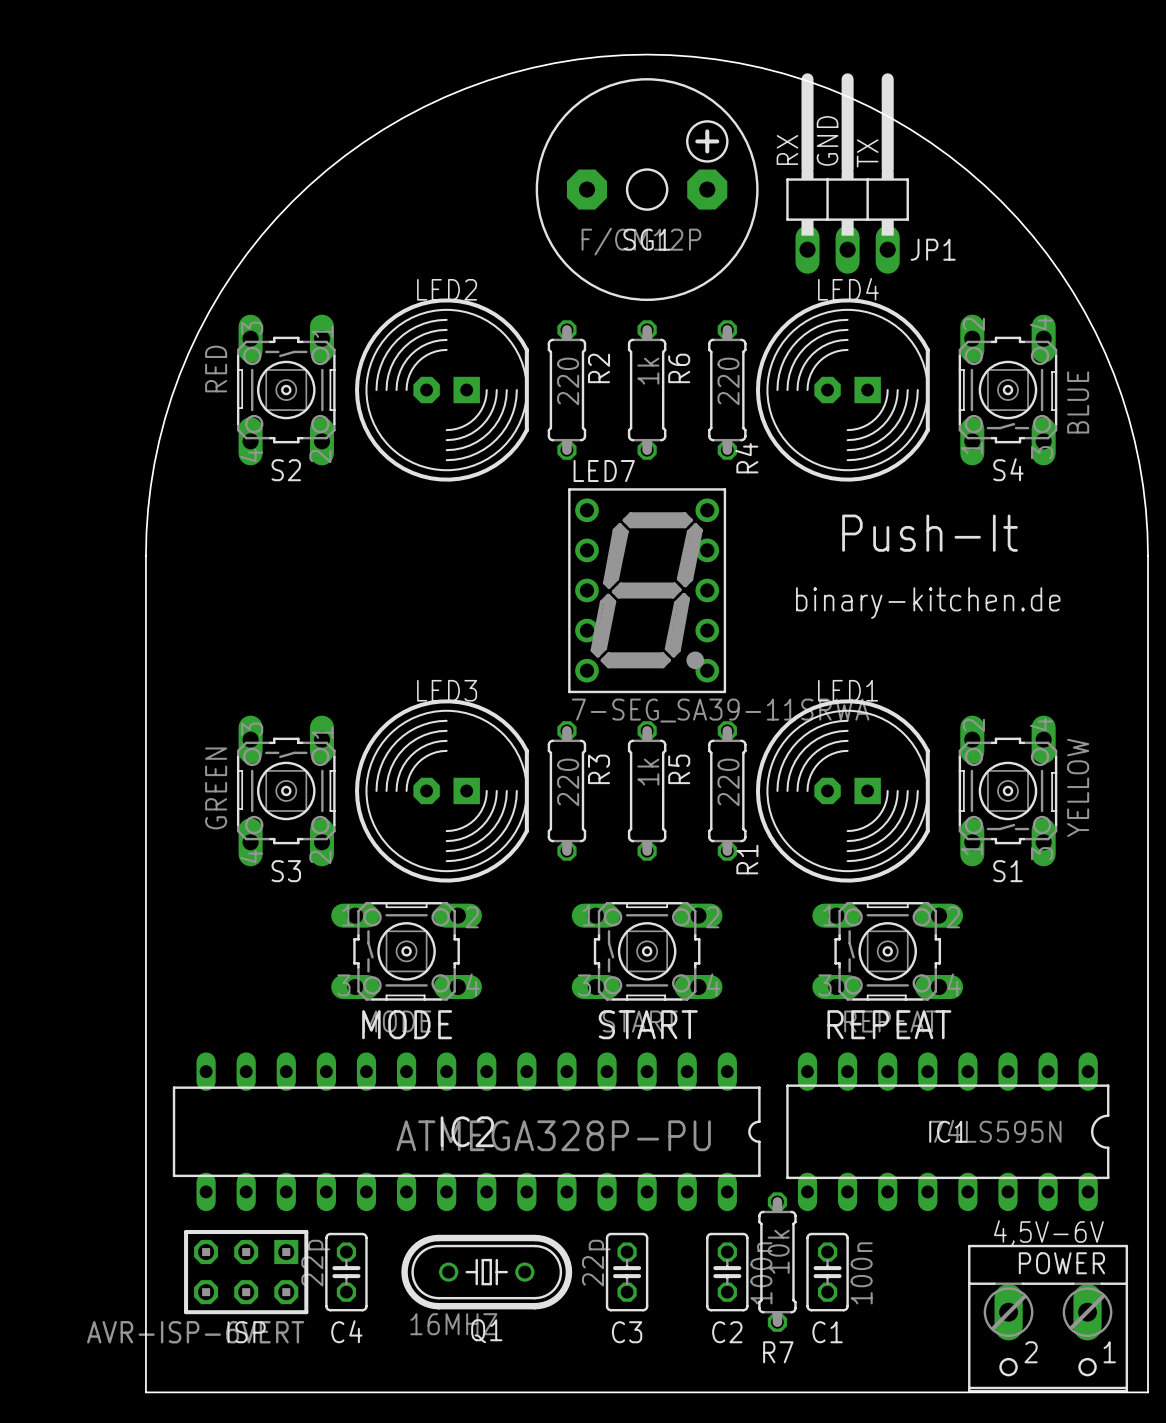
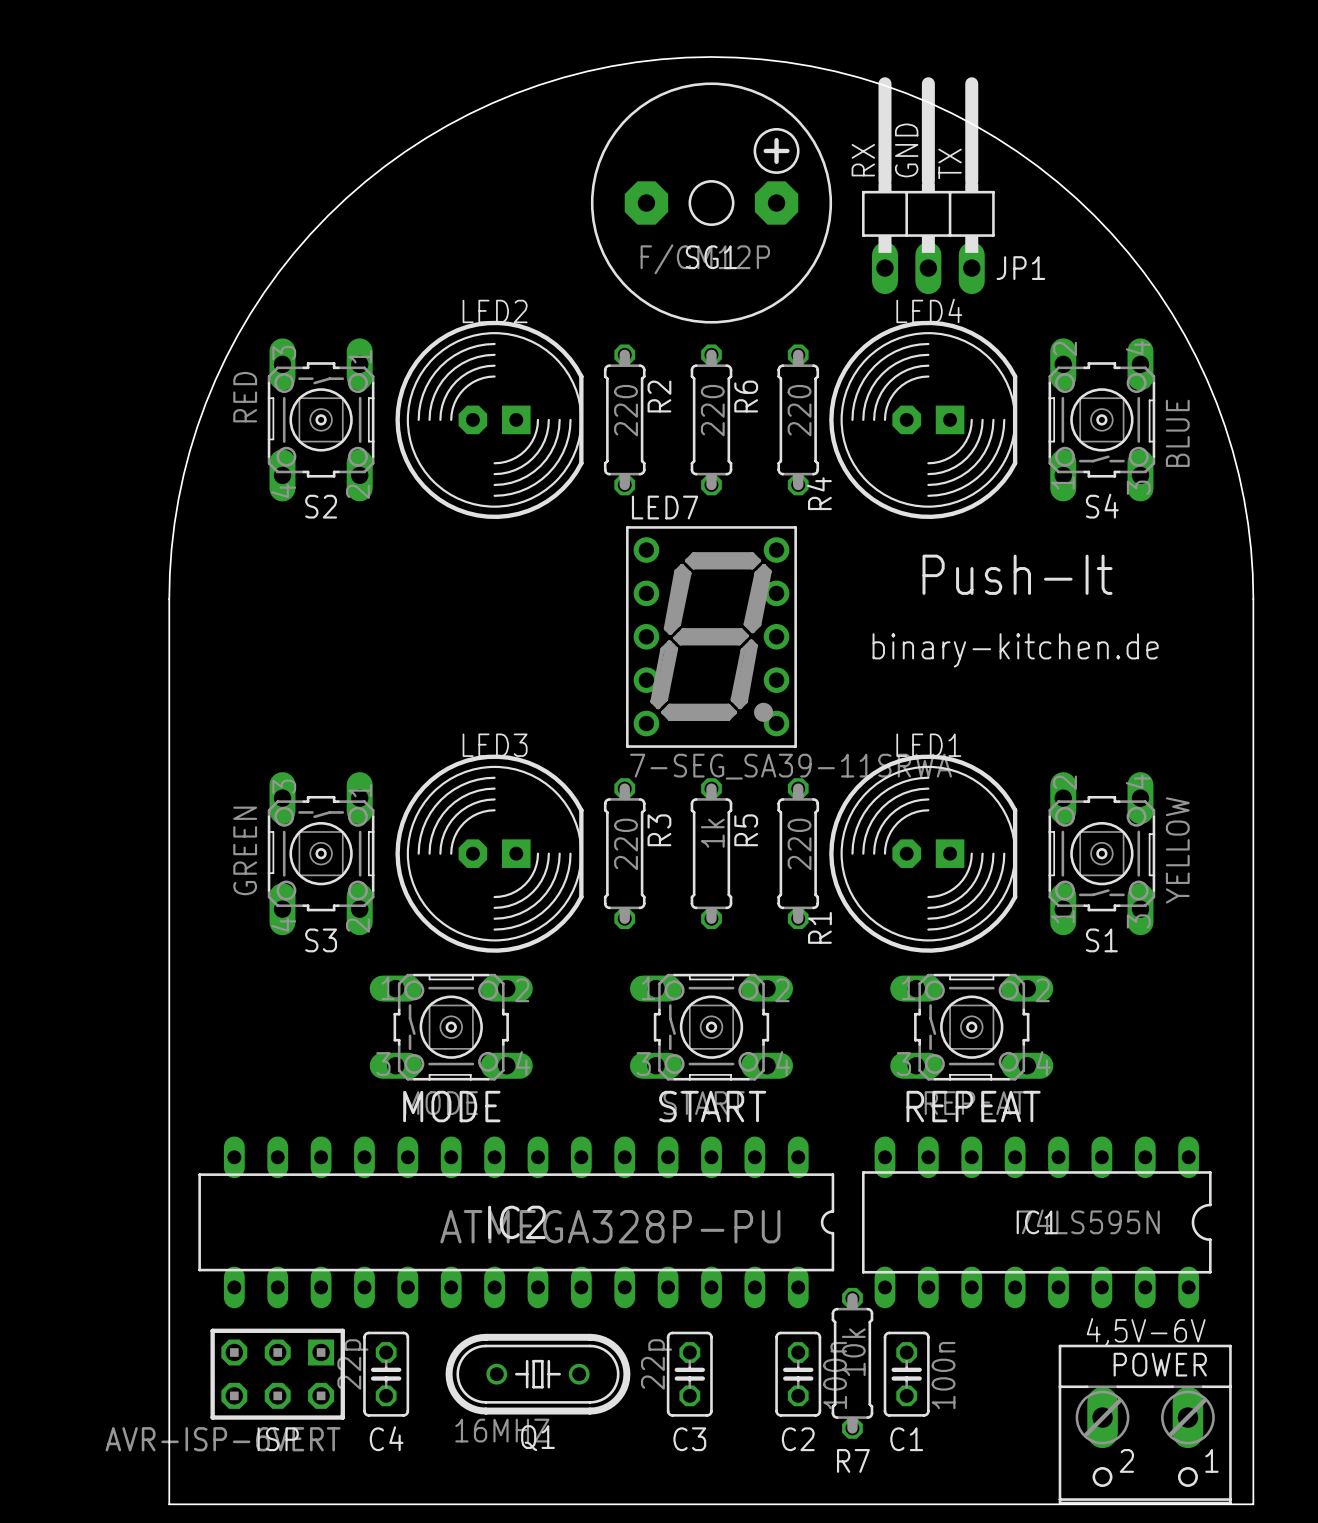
R6 value: 1k (648, 371) -> 220 (712, 410)

